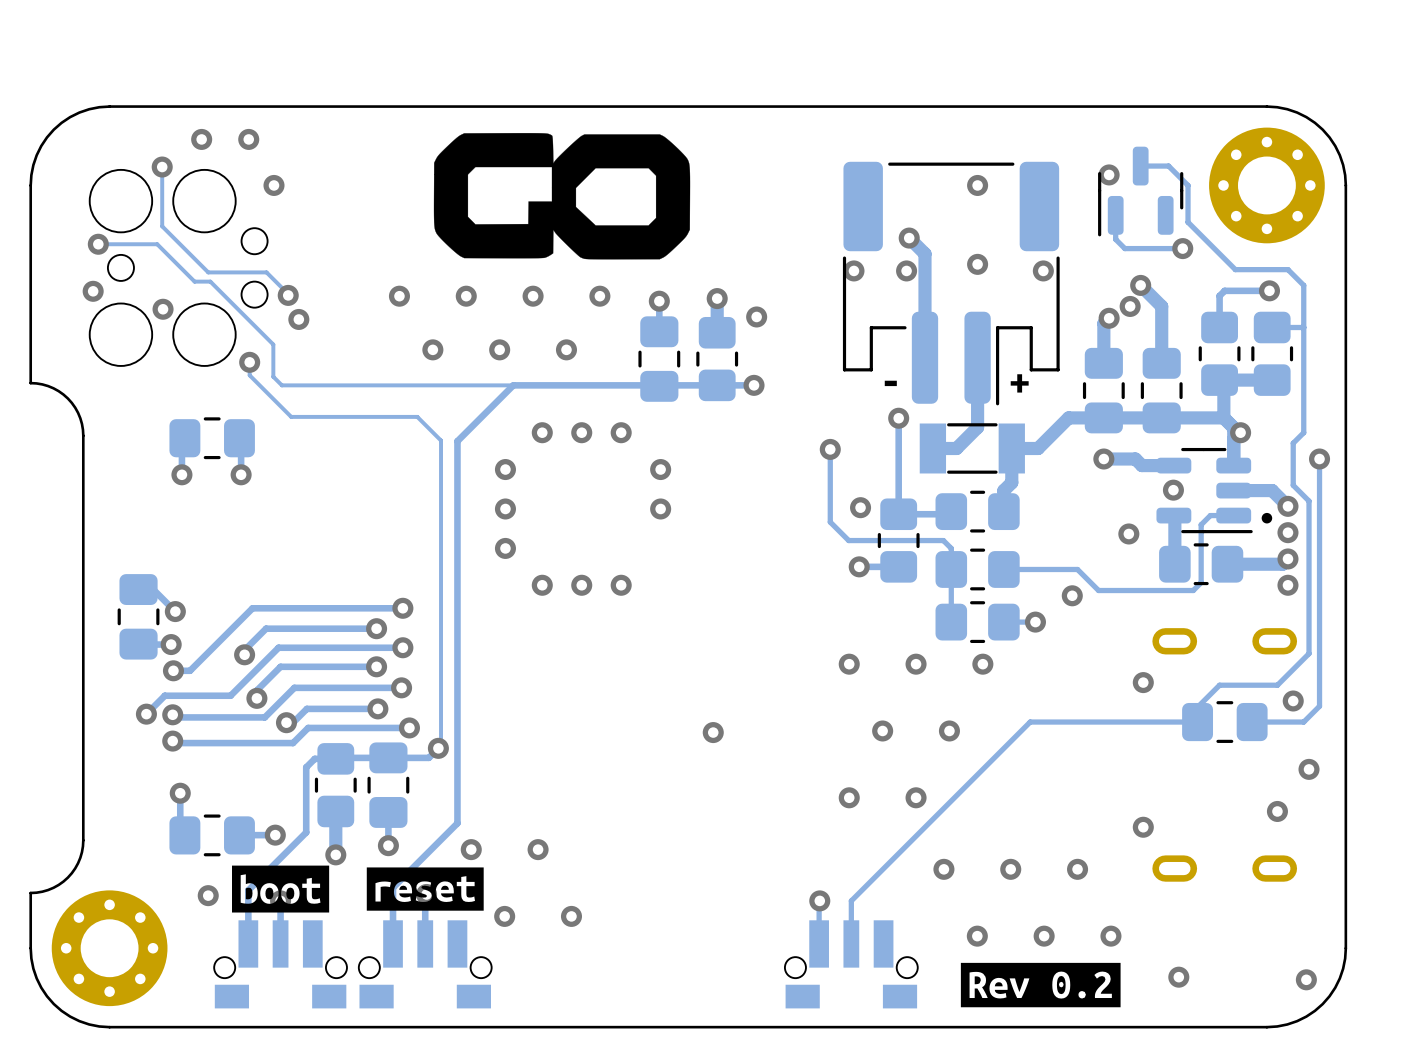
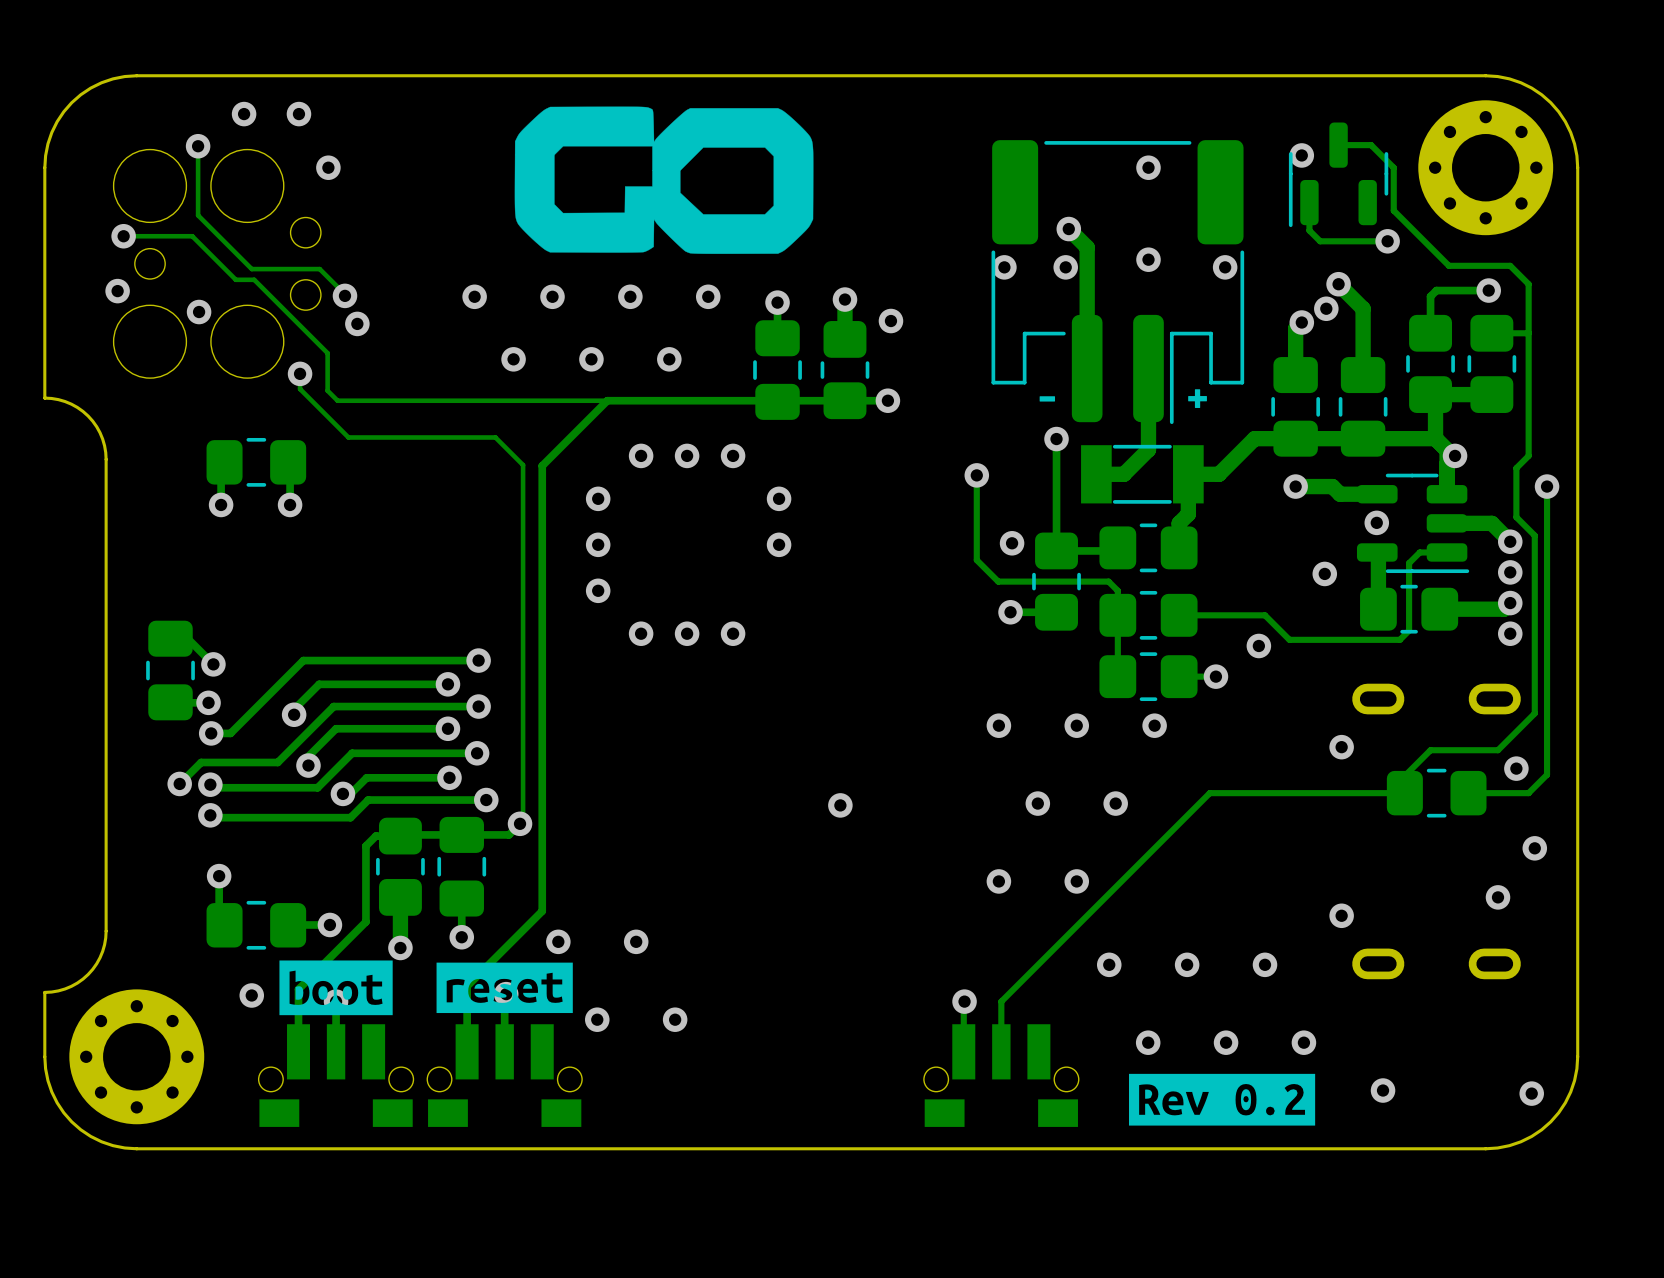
drawing: [1261, 512, 1273, 524] -> none

